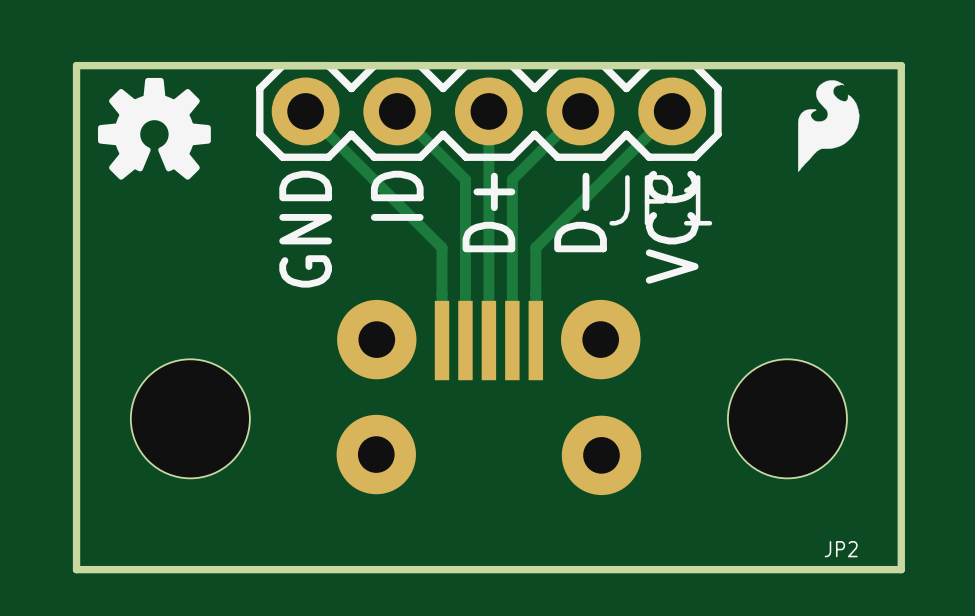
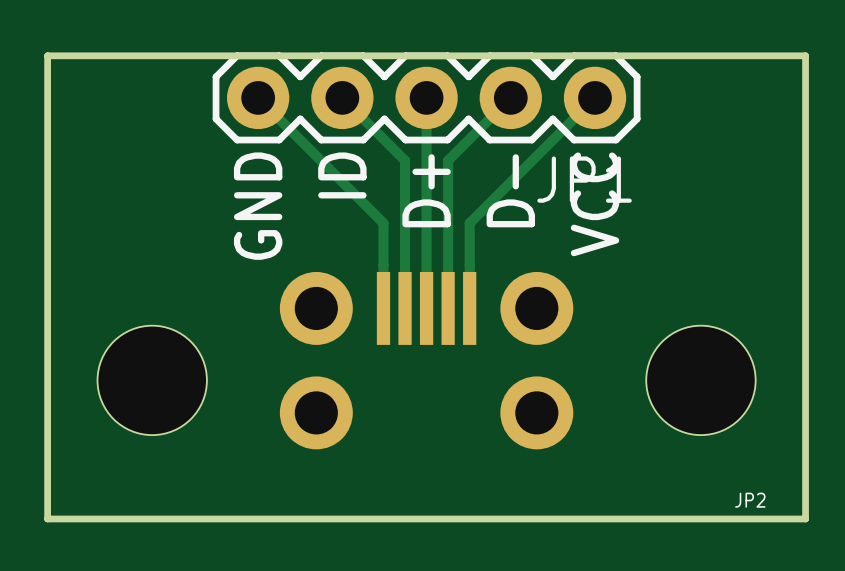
drawing: [98, 77, 211, 180] -> none
drawing: [798, 80, 860, 172] -> none
JP2 footprint: [130, 299, 847, 496] -> [97, 271, 756, 450]

